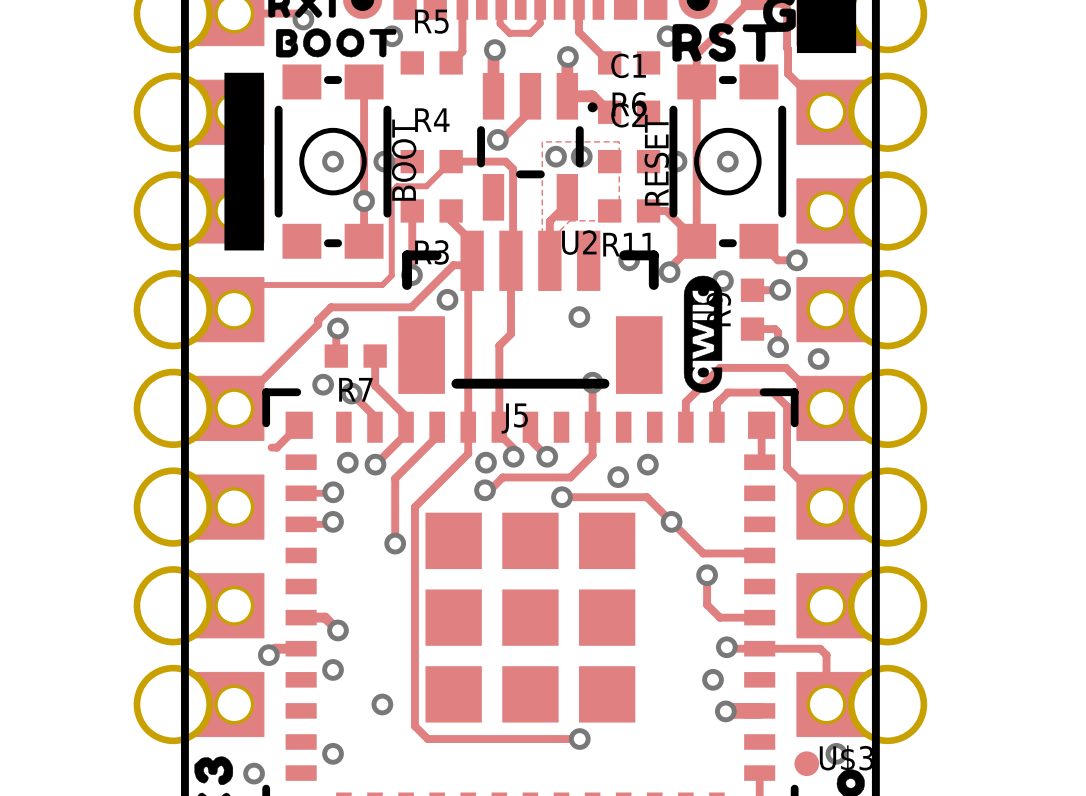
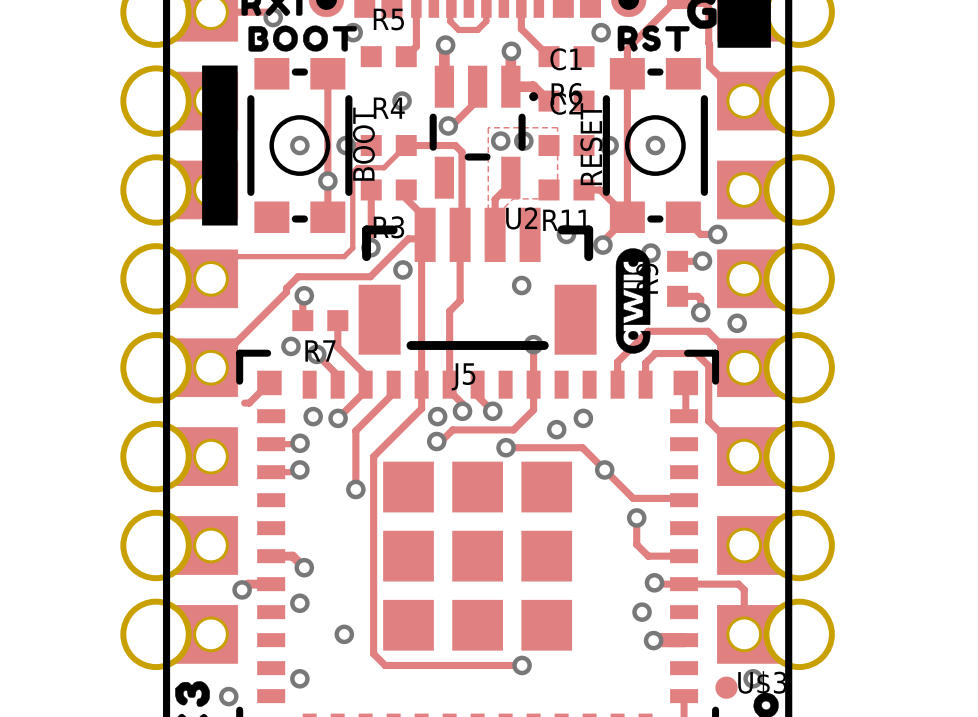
drawing shape: [672, 23, 779, 62] -> [617, 25, 690, 52]
via: none -> (402, 101)

